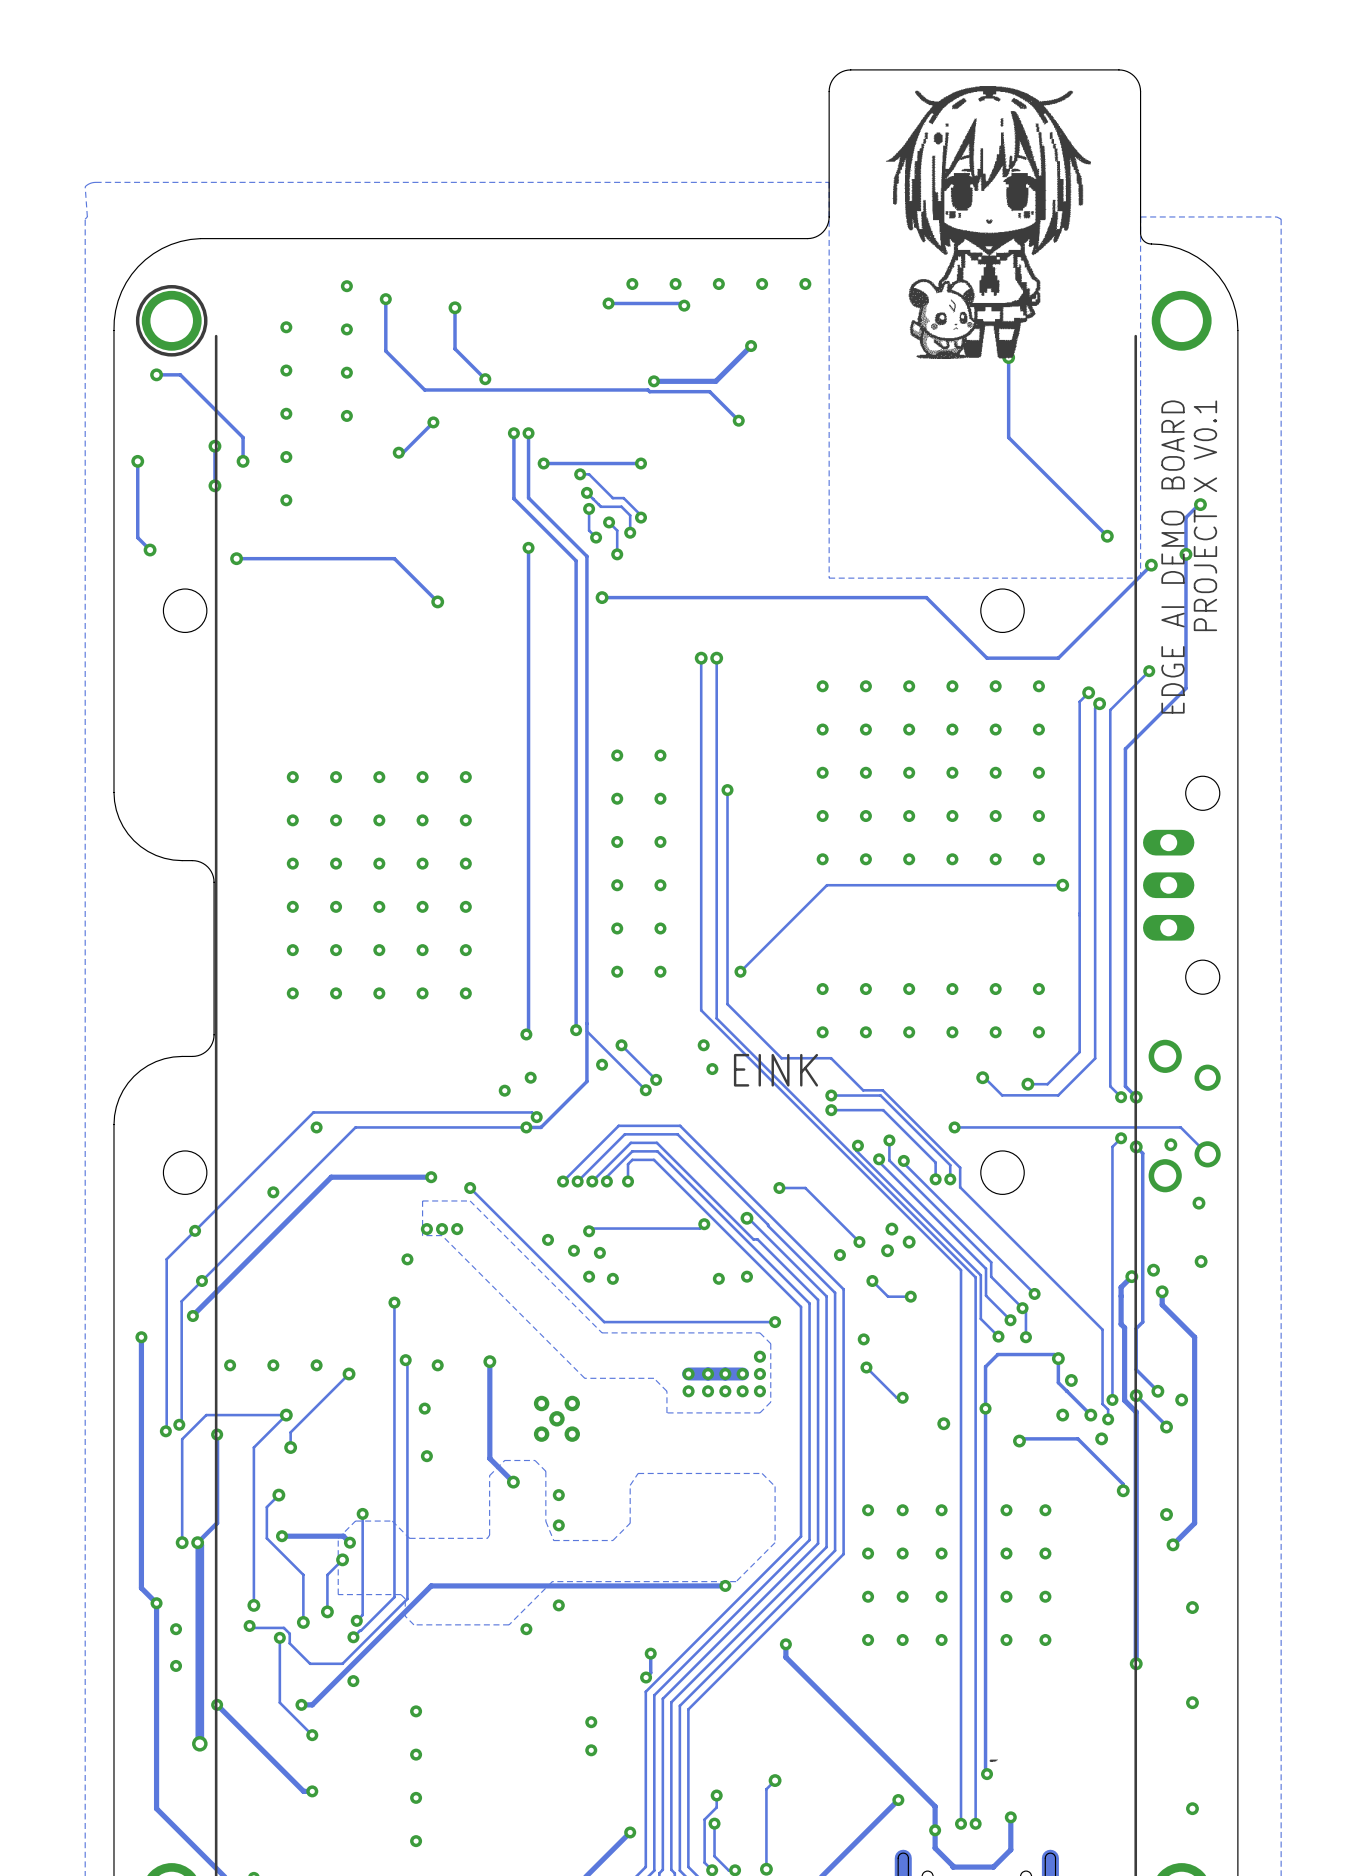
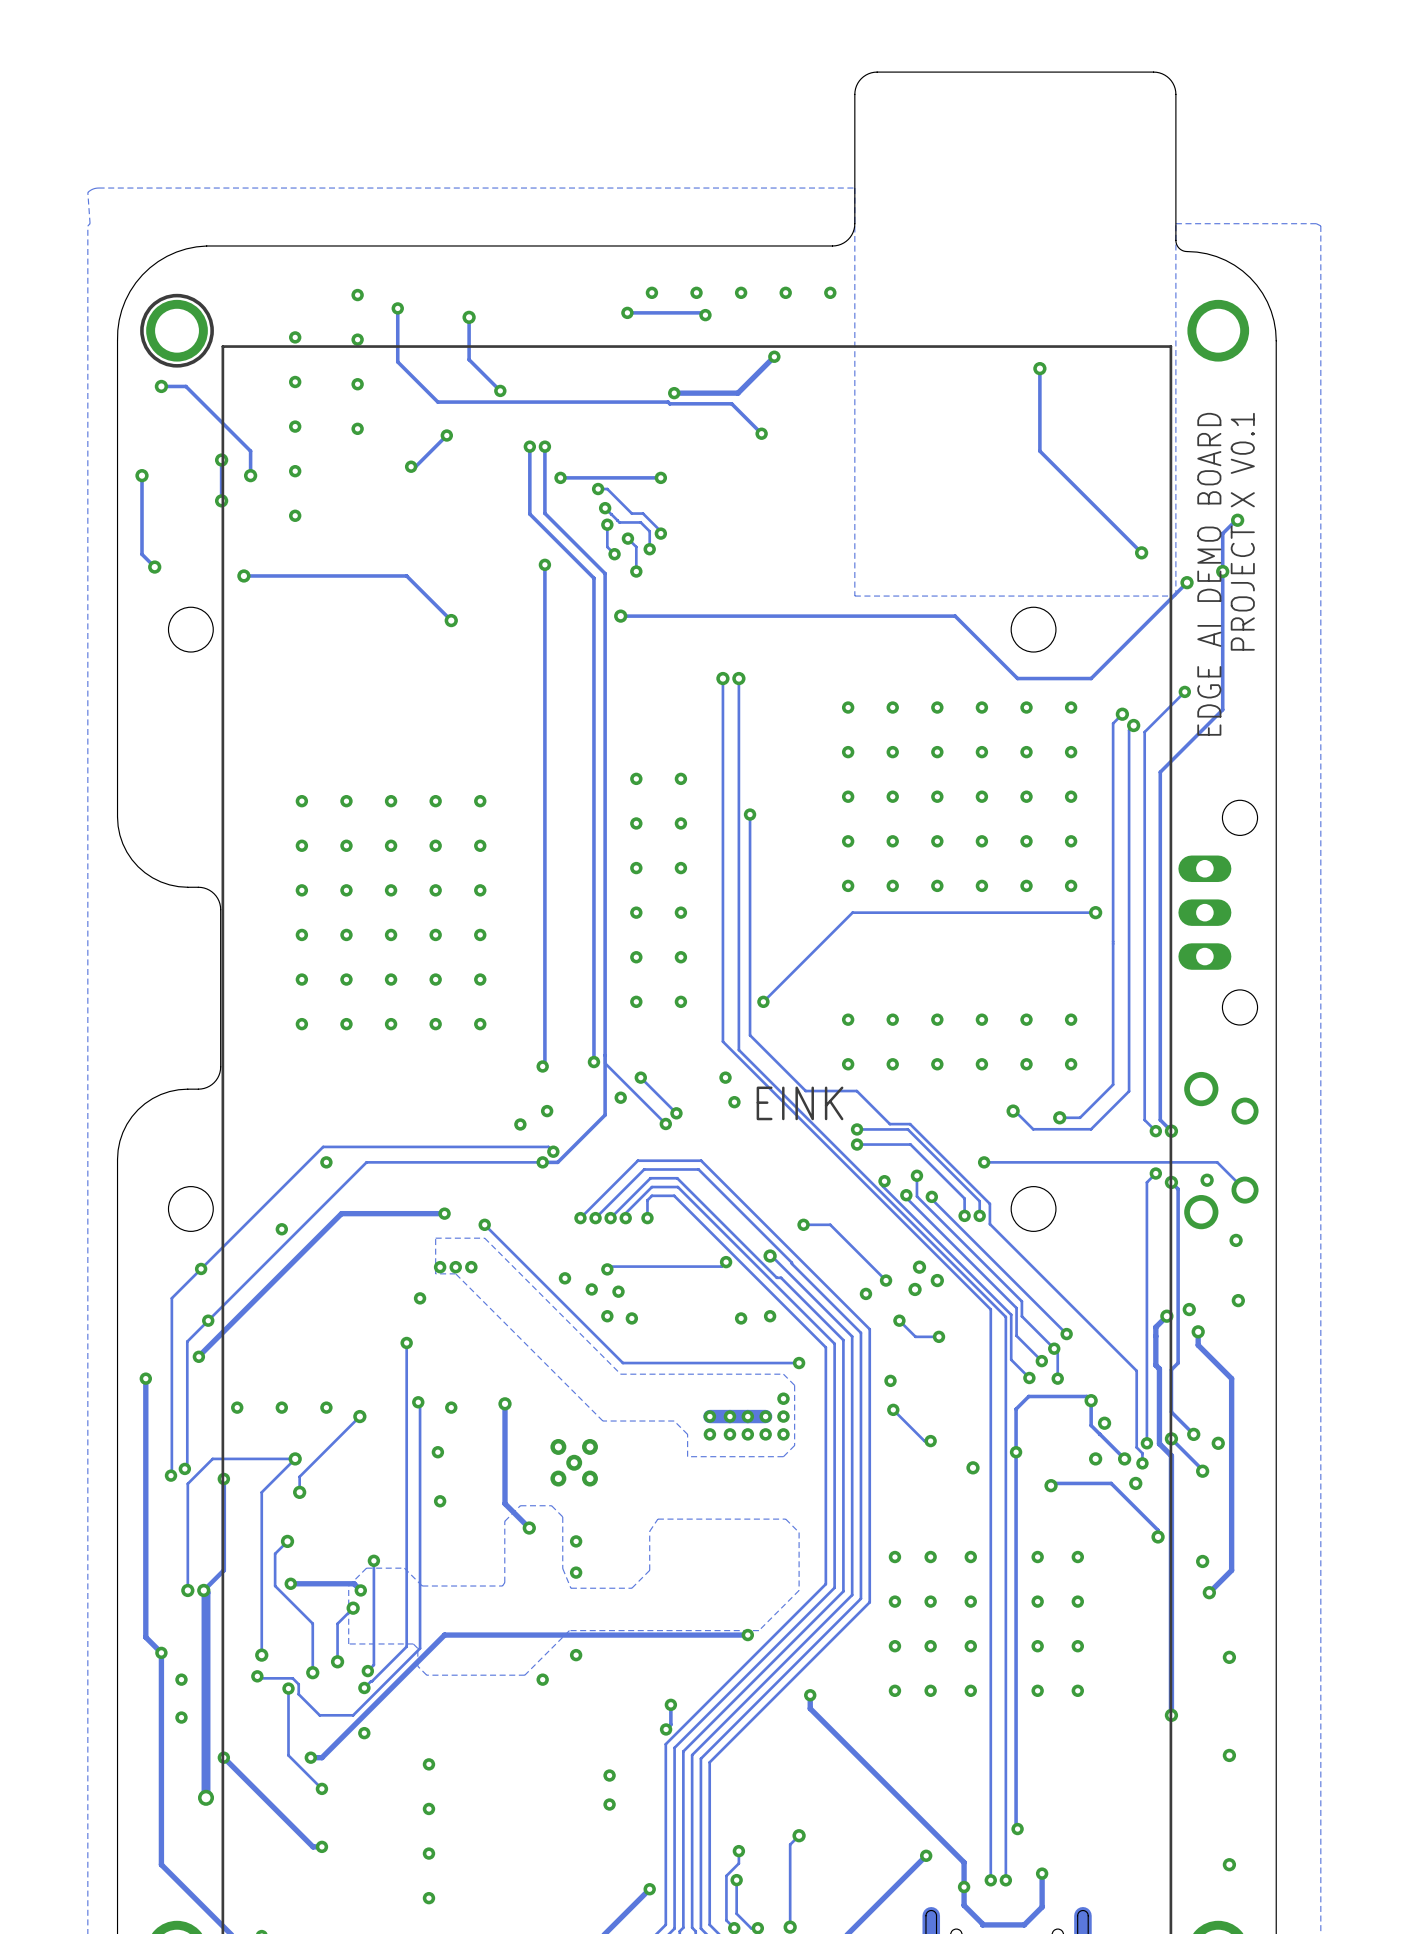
drawing: [885, 86, 1091, 359] -> none
line: none -> (1170, 346) (222, 346)
drawing: [989, 1759, 998, 1762] -> none

